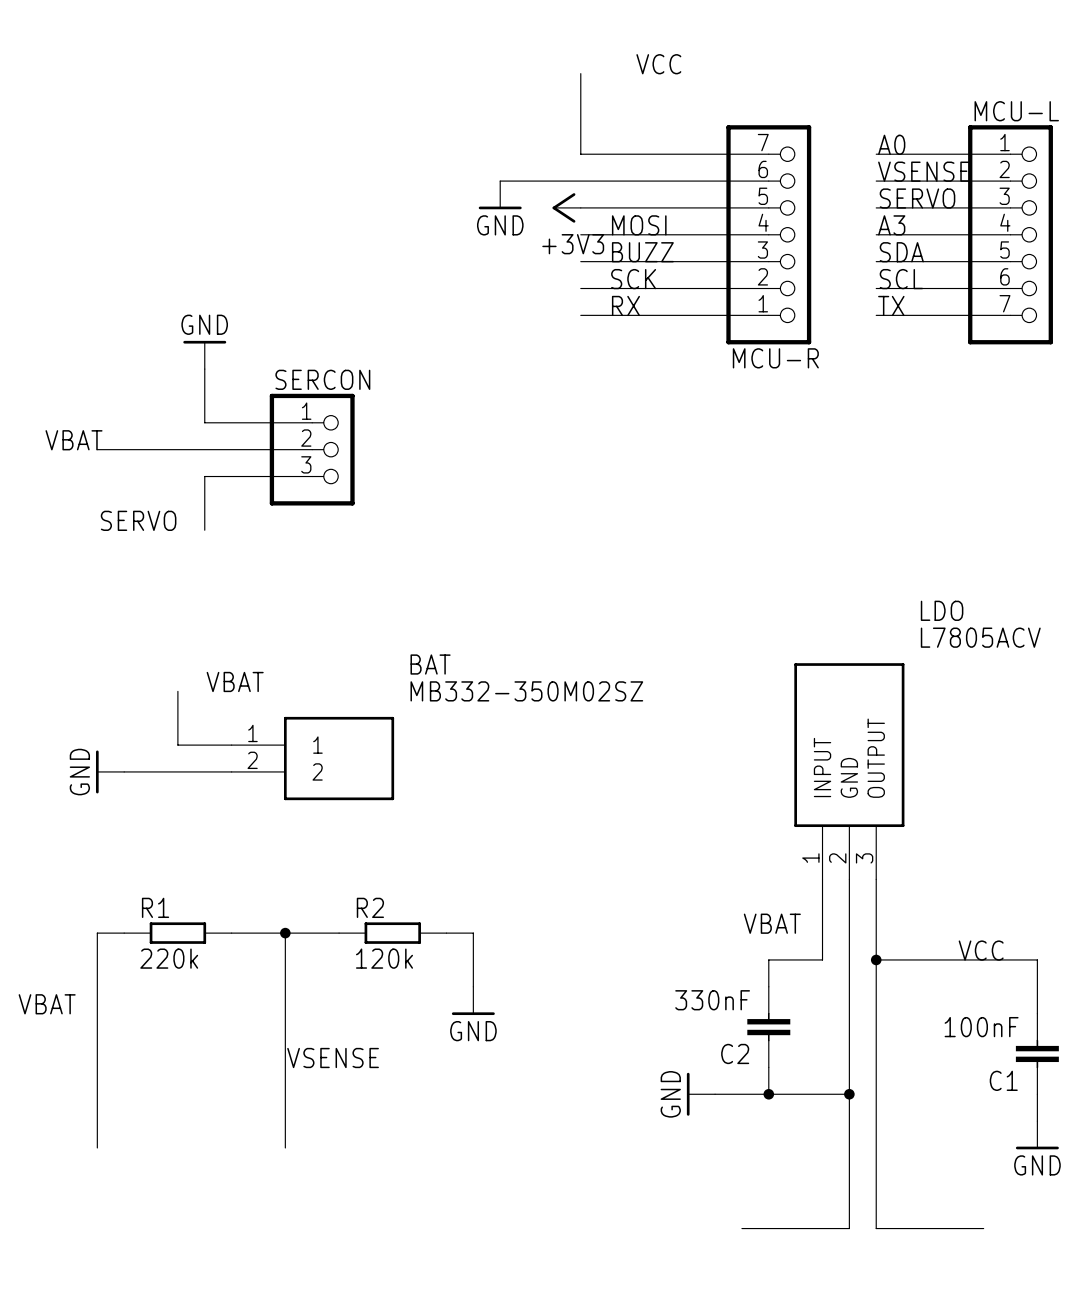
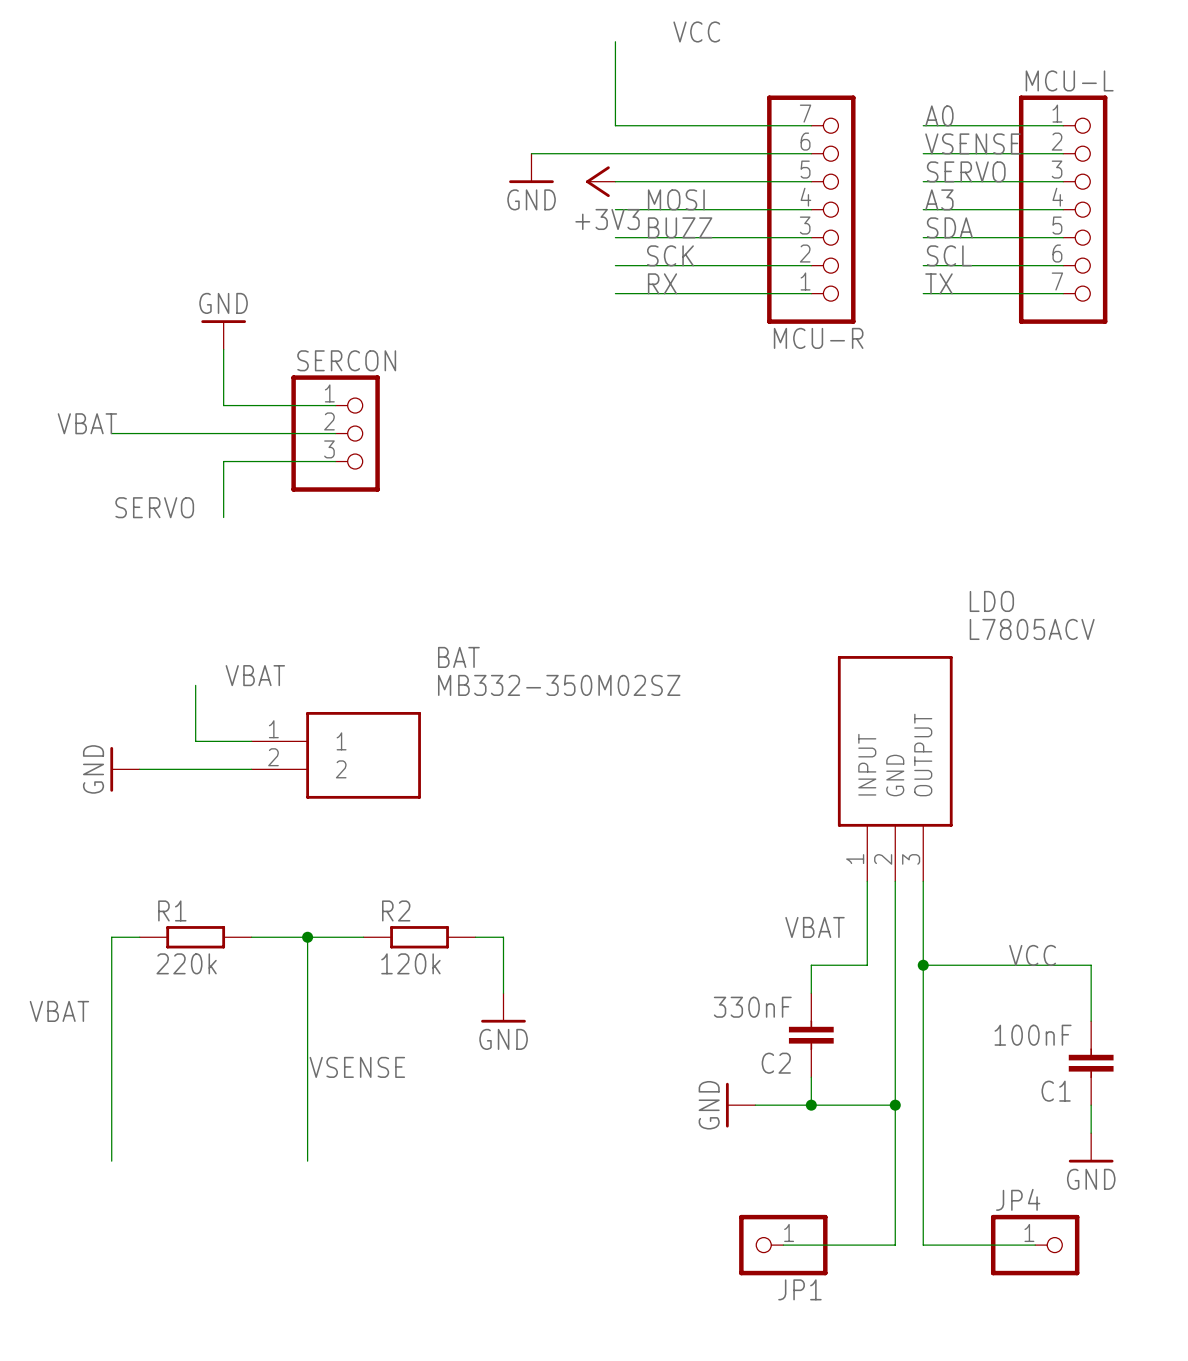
JP1: none -> (783, 1245)
JP4: none -> (1035, 1245)

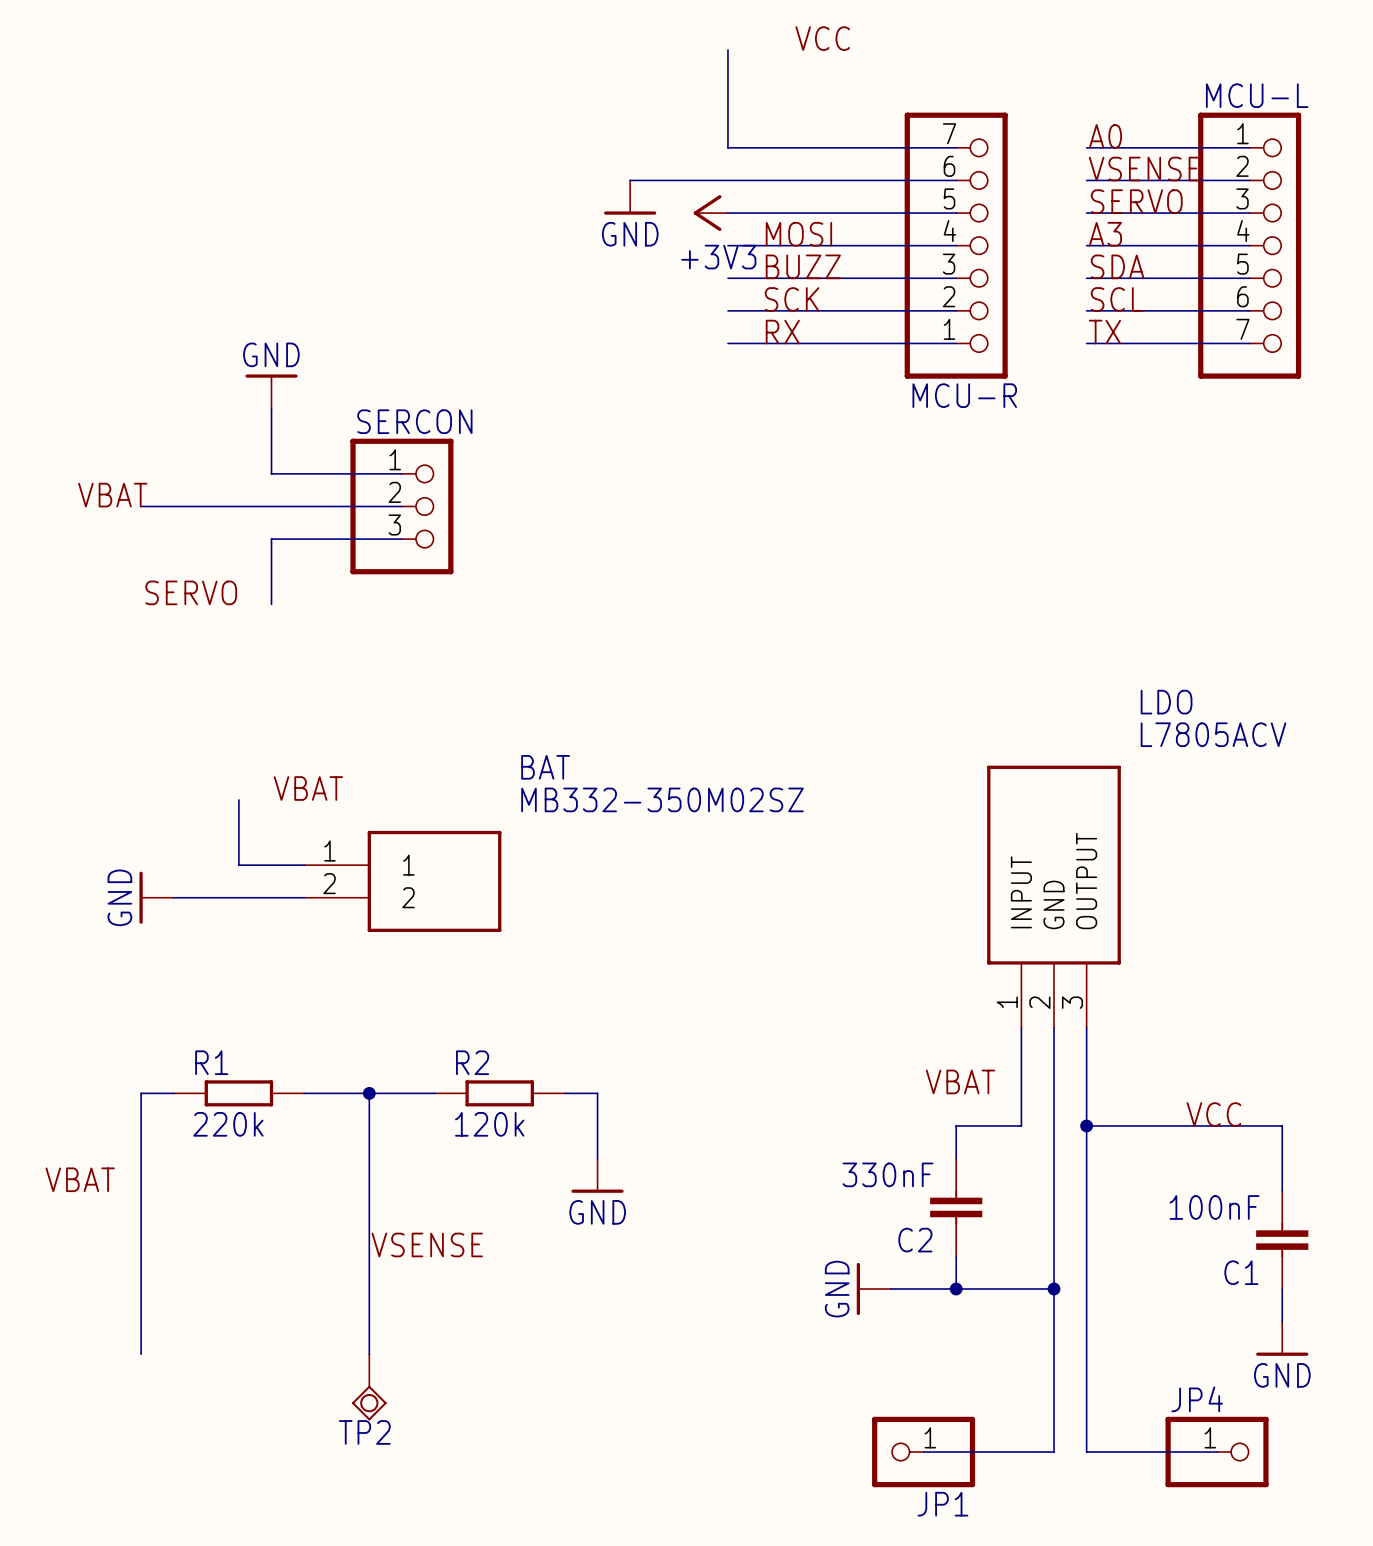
TP2: none -> (369, 1387)

